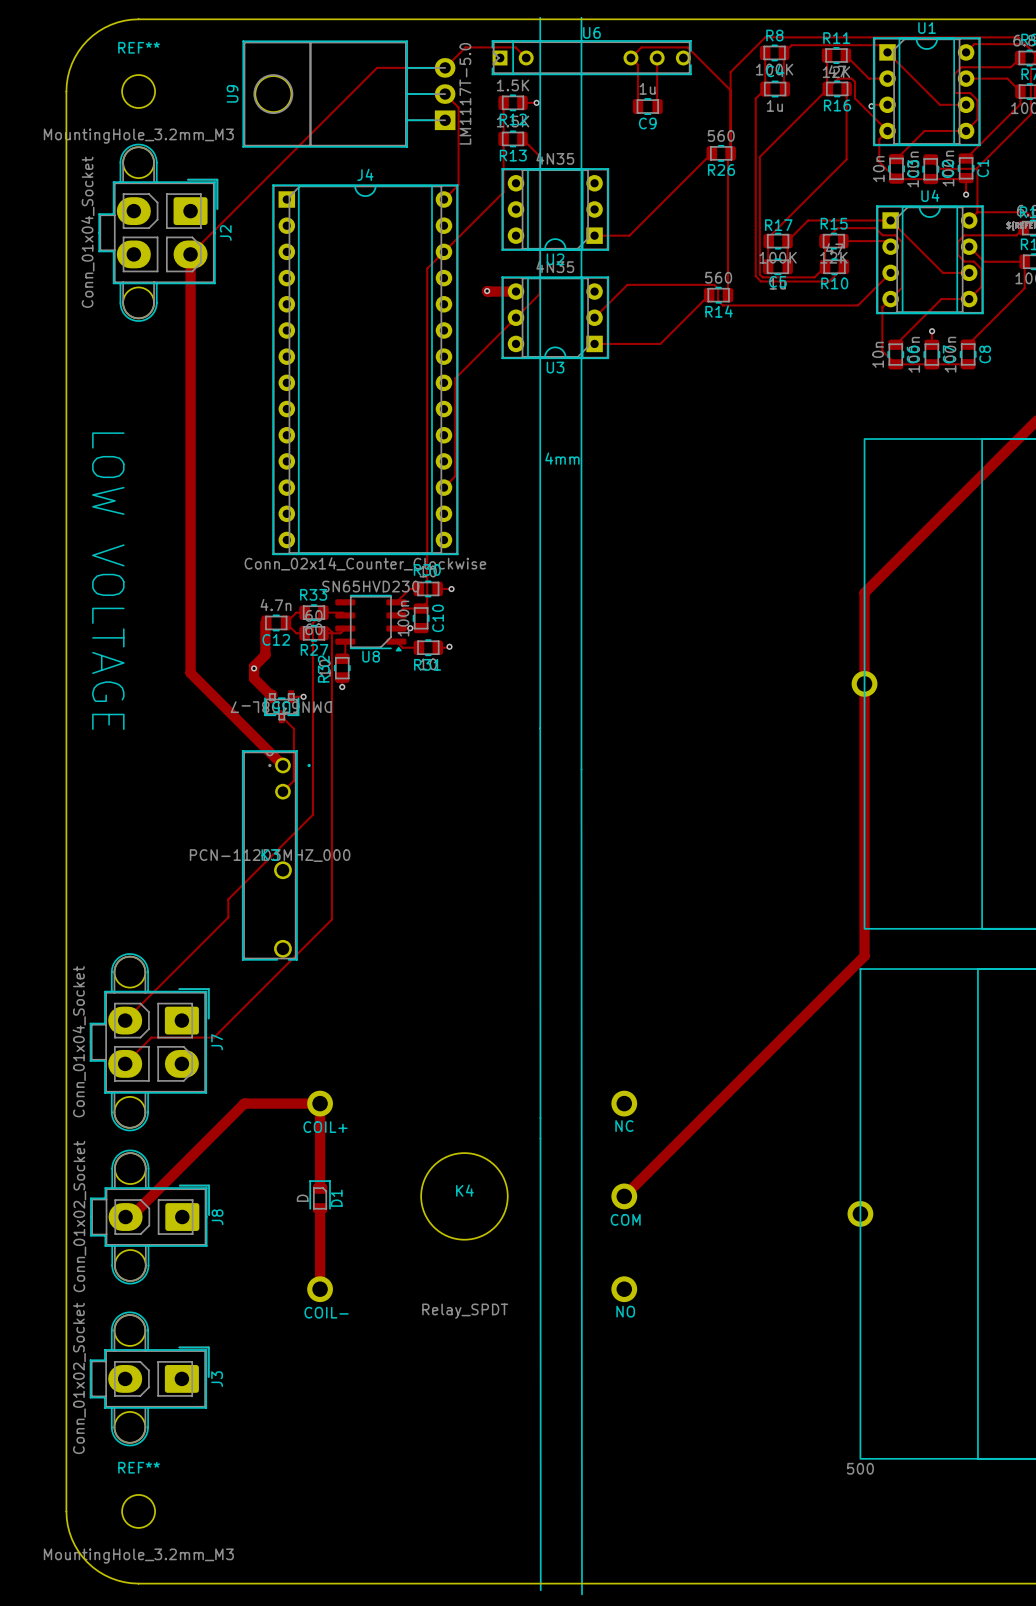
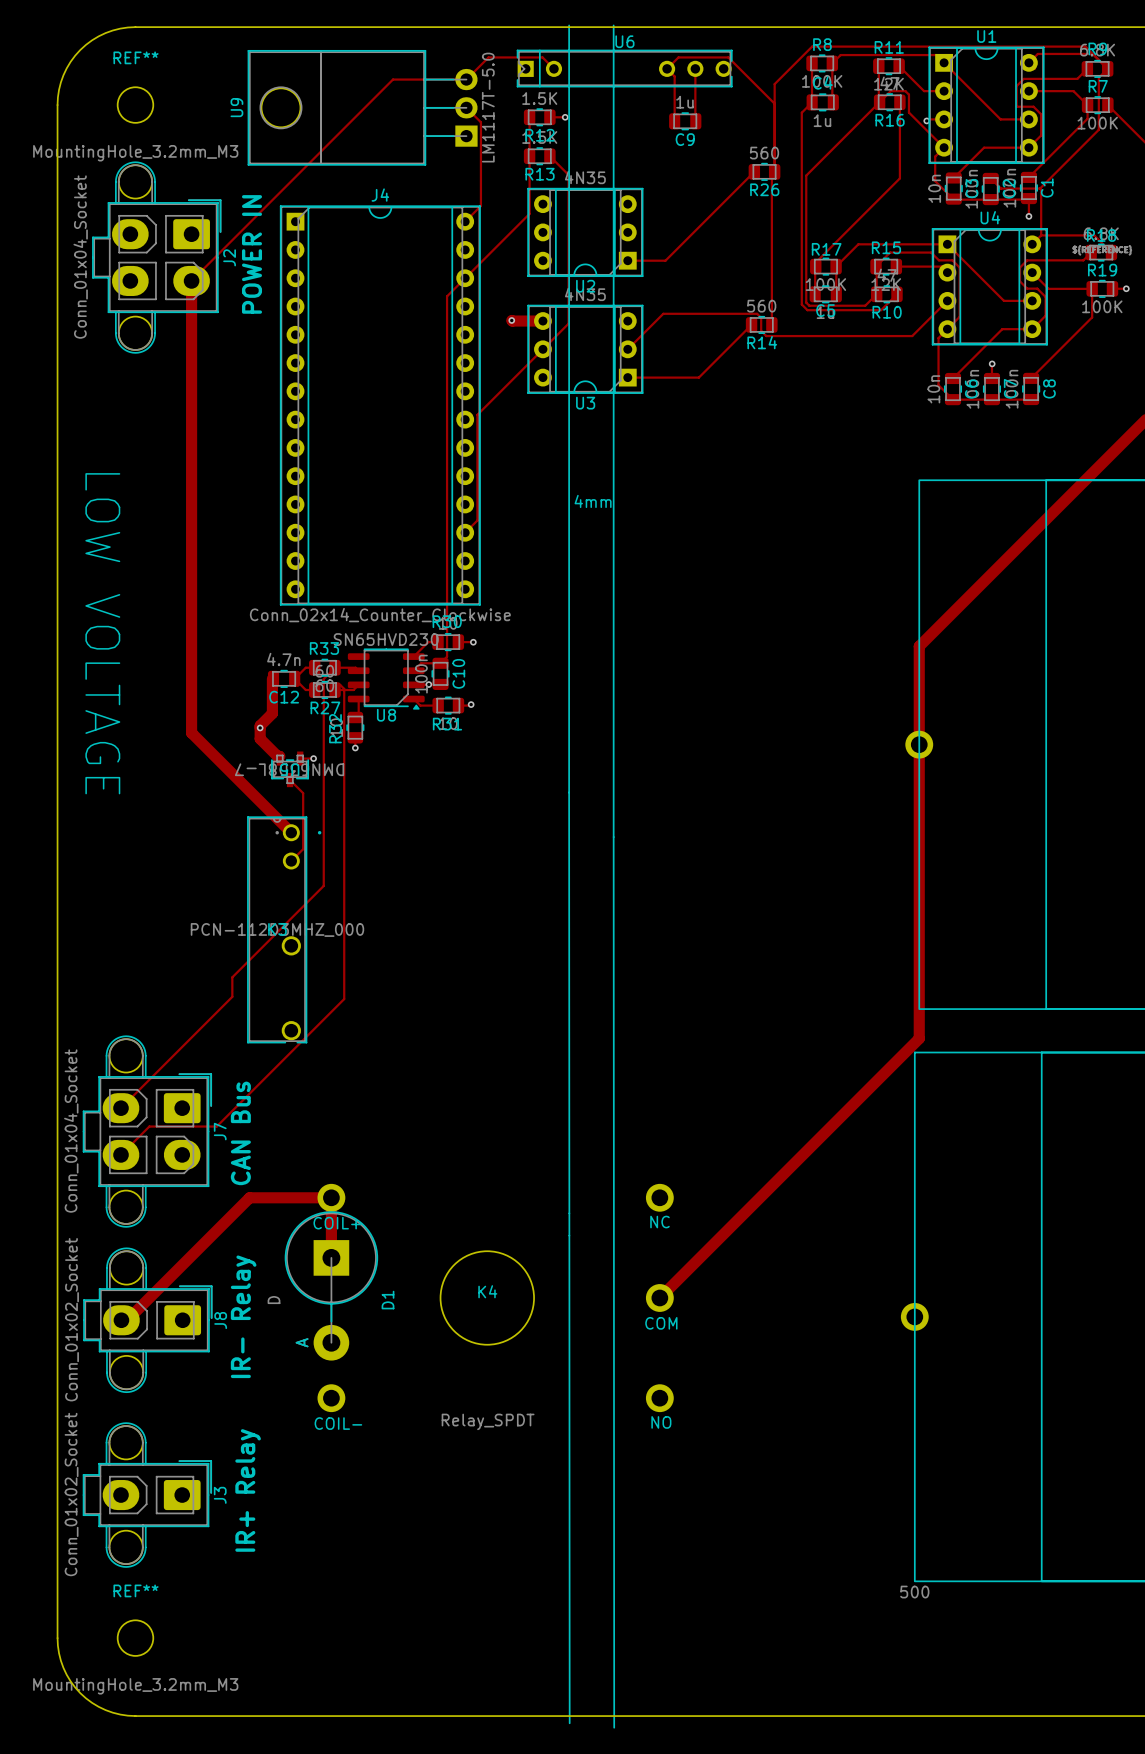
text: none -> POWER IN (252, 254)
text: none -> CAN Bus (240, 1133)
track: (320, 1159) (320, 1187) -> none
D1 footprint: [309, 1180, 331, 1214] -> [284, 1211, 378, 1361]
D1 value position: D (302, 1198) -> D (274, 1300)
D1 name position: D1 (336, 1198) -> D1 (388, 1300)
track: (320, 1209) (320, 1289) -> none
text: none -> IR- Relay (243, 1316)
text: none -> IR+ Relay (248, 1490)

